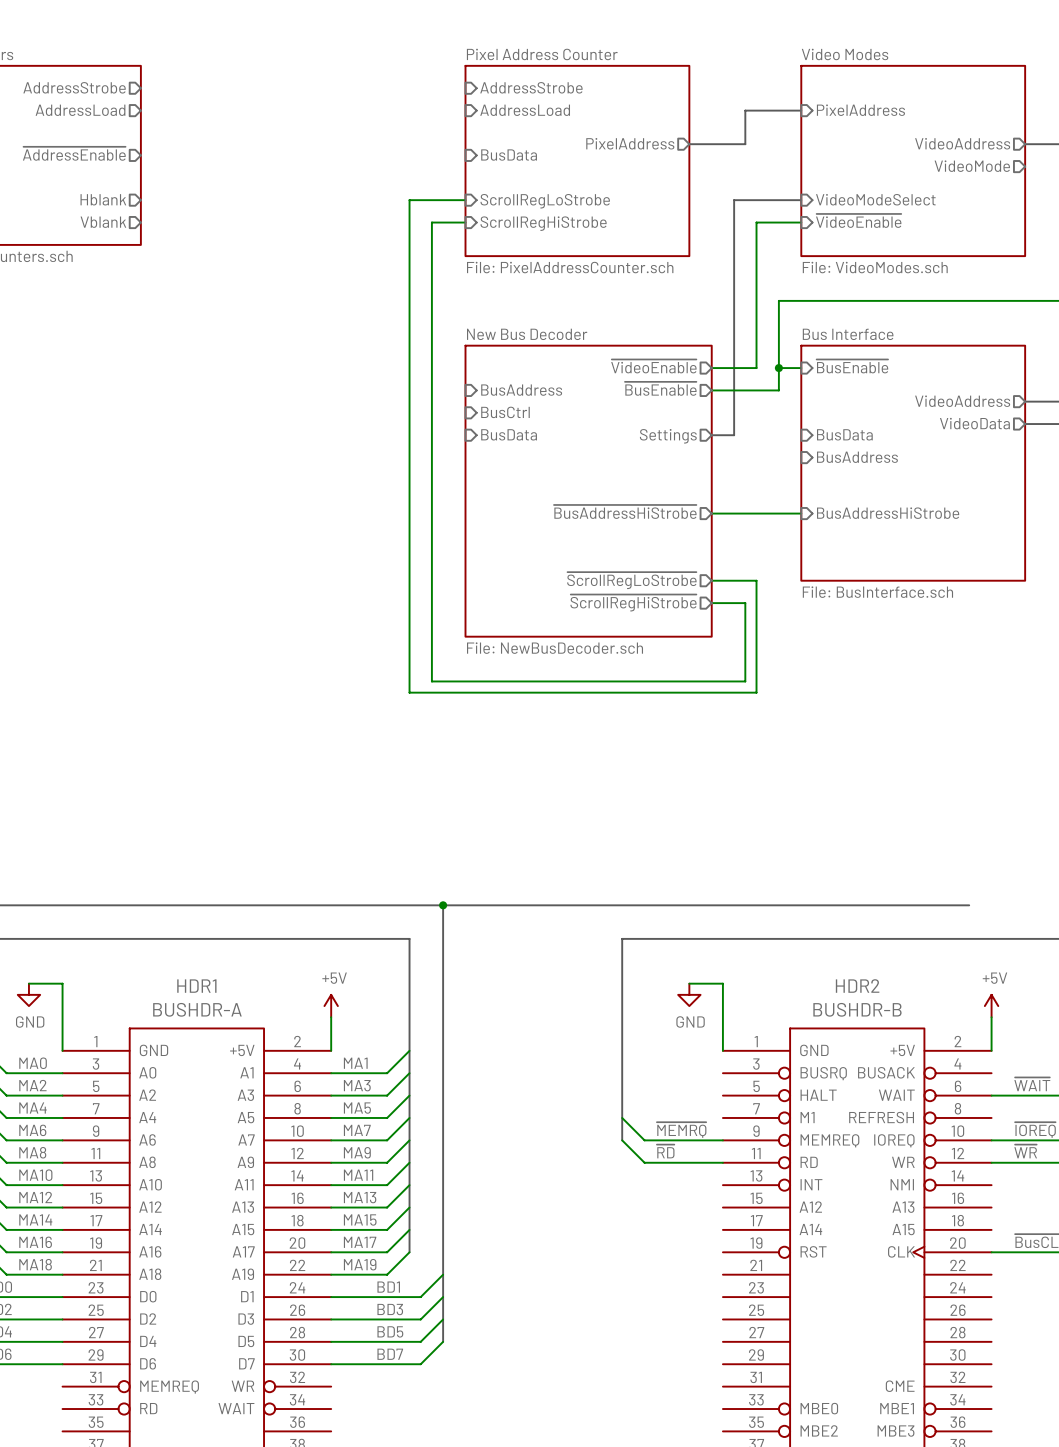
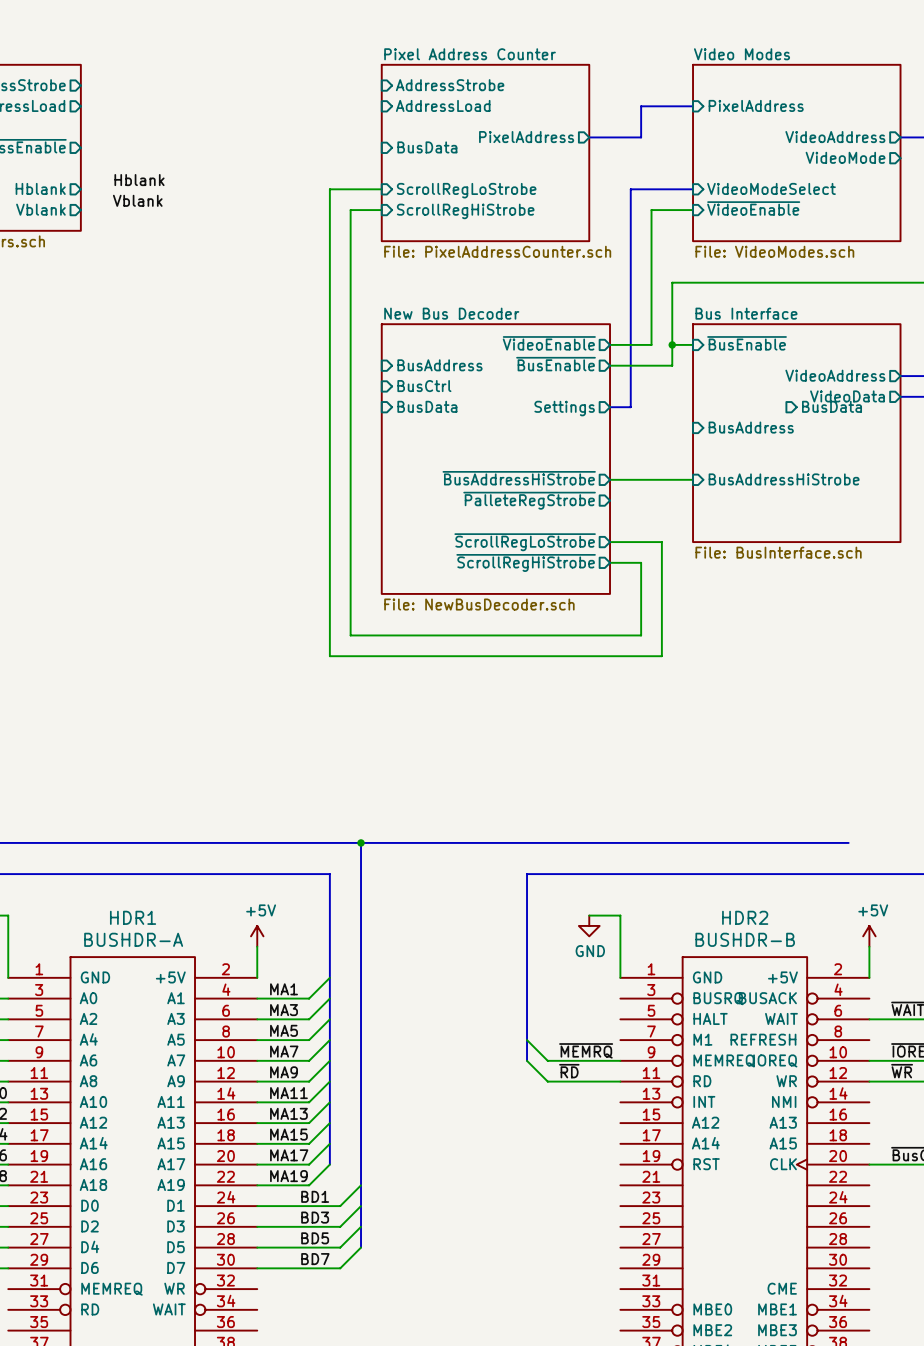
label: none -> Hblank (139, 180)
label: none -> Vblank (137, 200)
sheet pin position: BusData (844, 434) -> BusData (832, 406)
sheet pin: none -> ~{PalleteRegStrobe} (529, 500)
wire: (756, 580) (756, 692) (409, 692) -> (651, 542) (661, 542) (661, 656) (329, 656) (329, 645)

